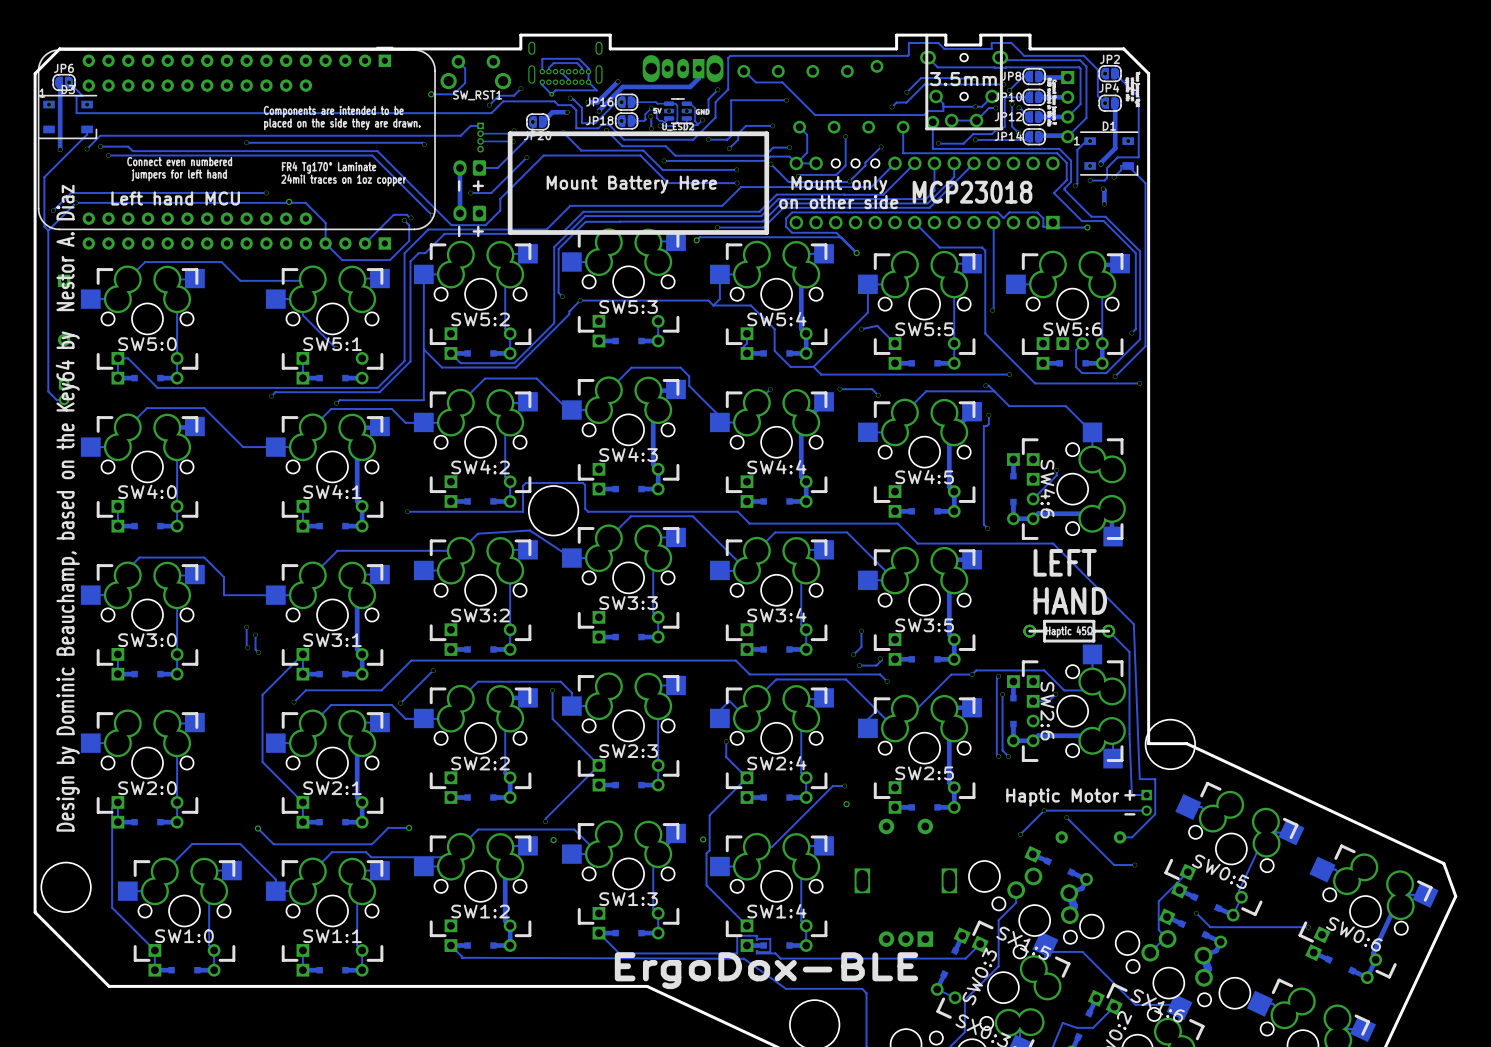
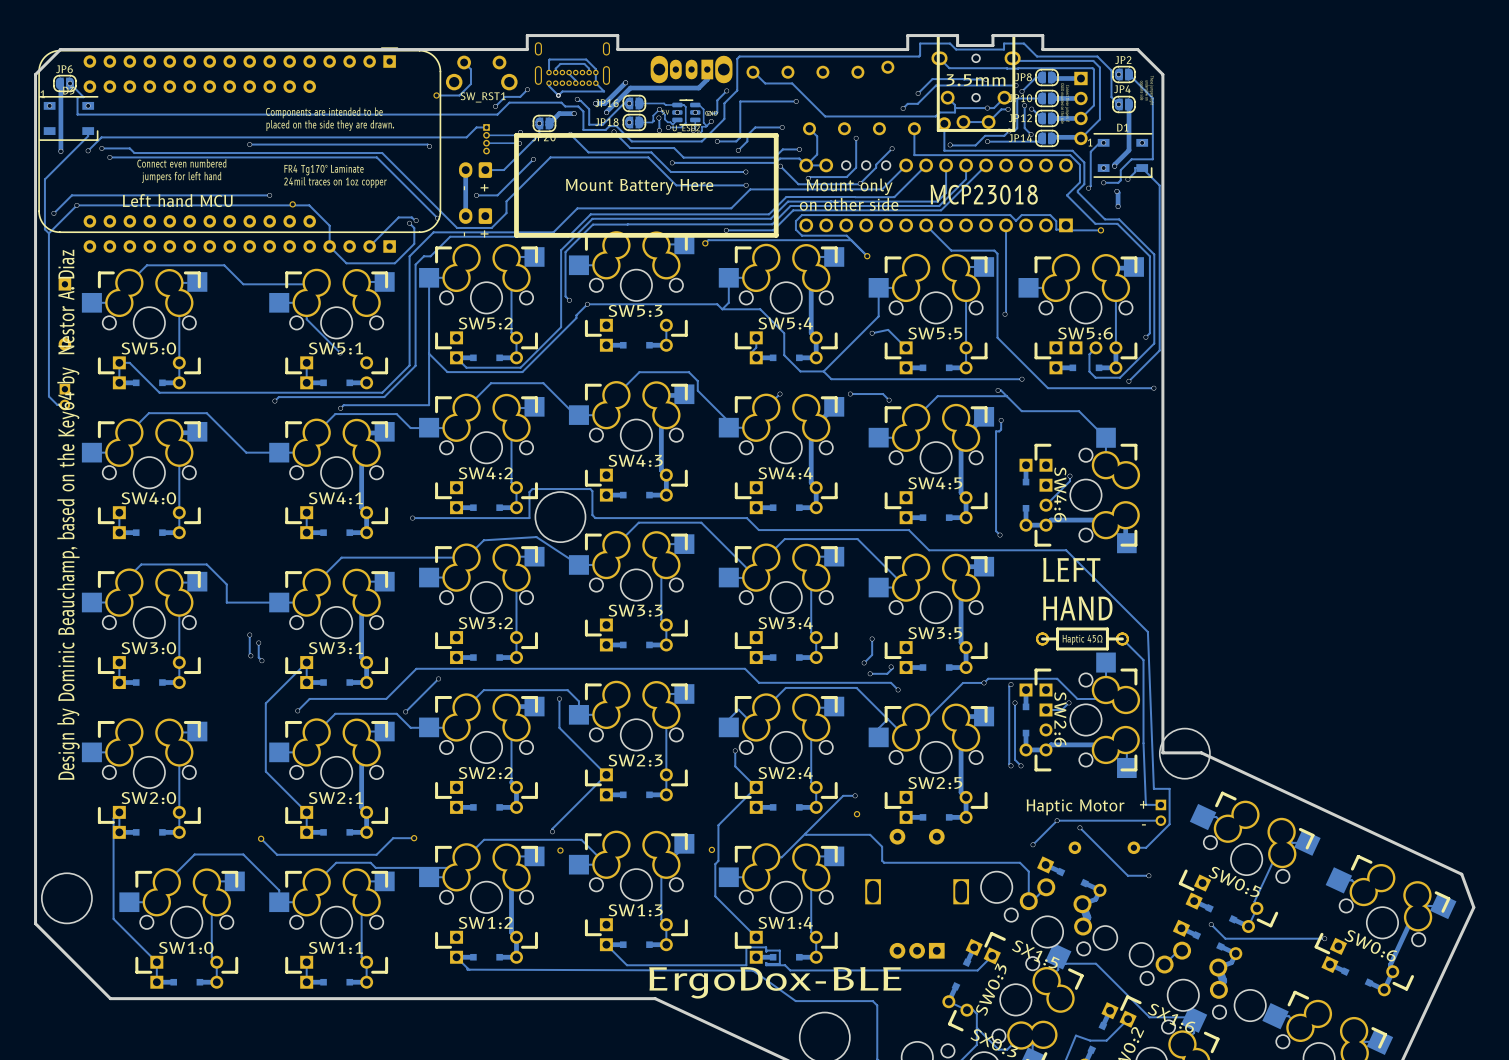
track: none -> (805, 833) (870, 834) (882, 846) (882, 860) (884, 862) (1020, 862) (1028, 871) (1028, 901) (1032, 901) (1046, 887)
track: (1187, 872) (1158, 901) (1158, 930) (1167, 938) -> none
track: (1016, 890) (1016, 902) (998, 920) (998, 966) (964, 1001) -> (966, 1010) (973, 1010) (976, 1013)
track: none -> (976, 1027) (998, 1049) (1007, 1049) (1021, 1035)

